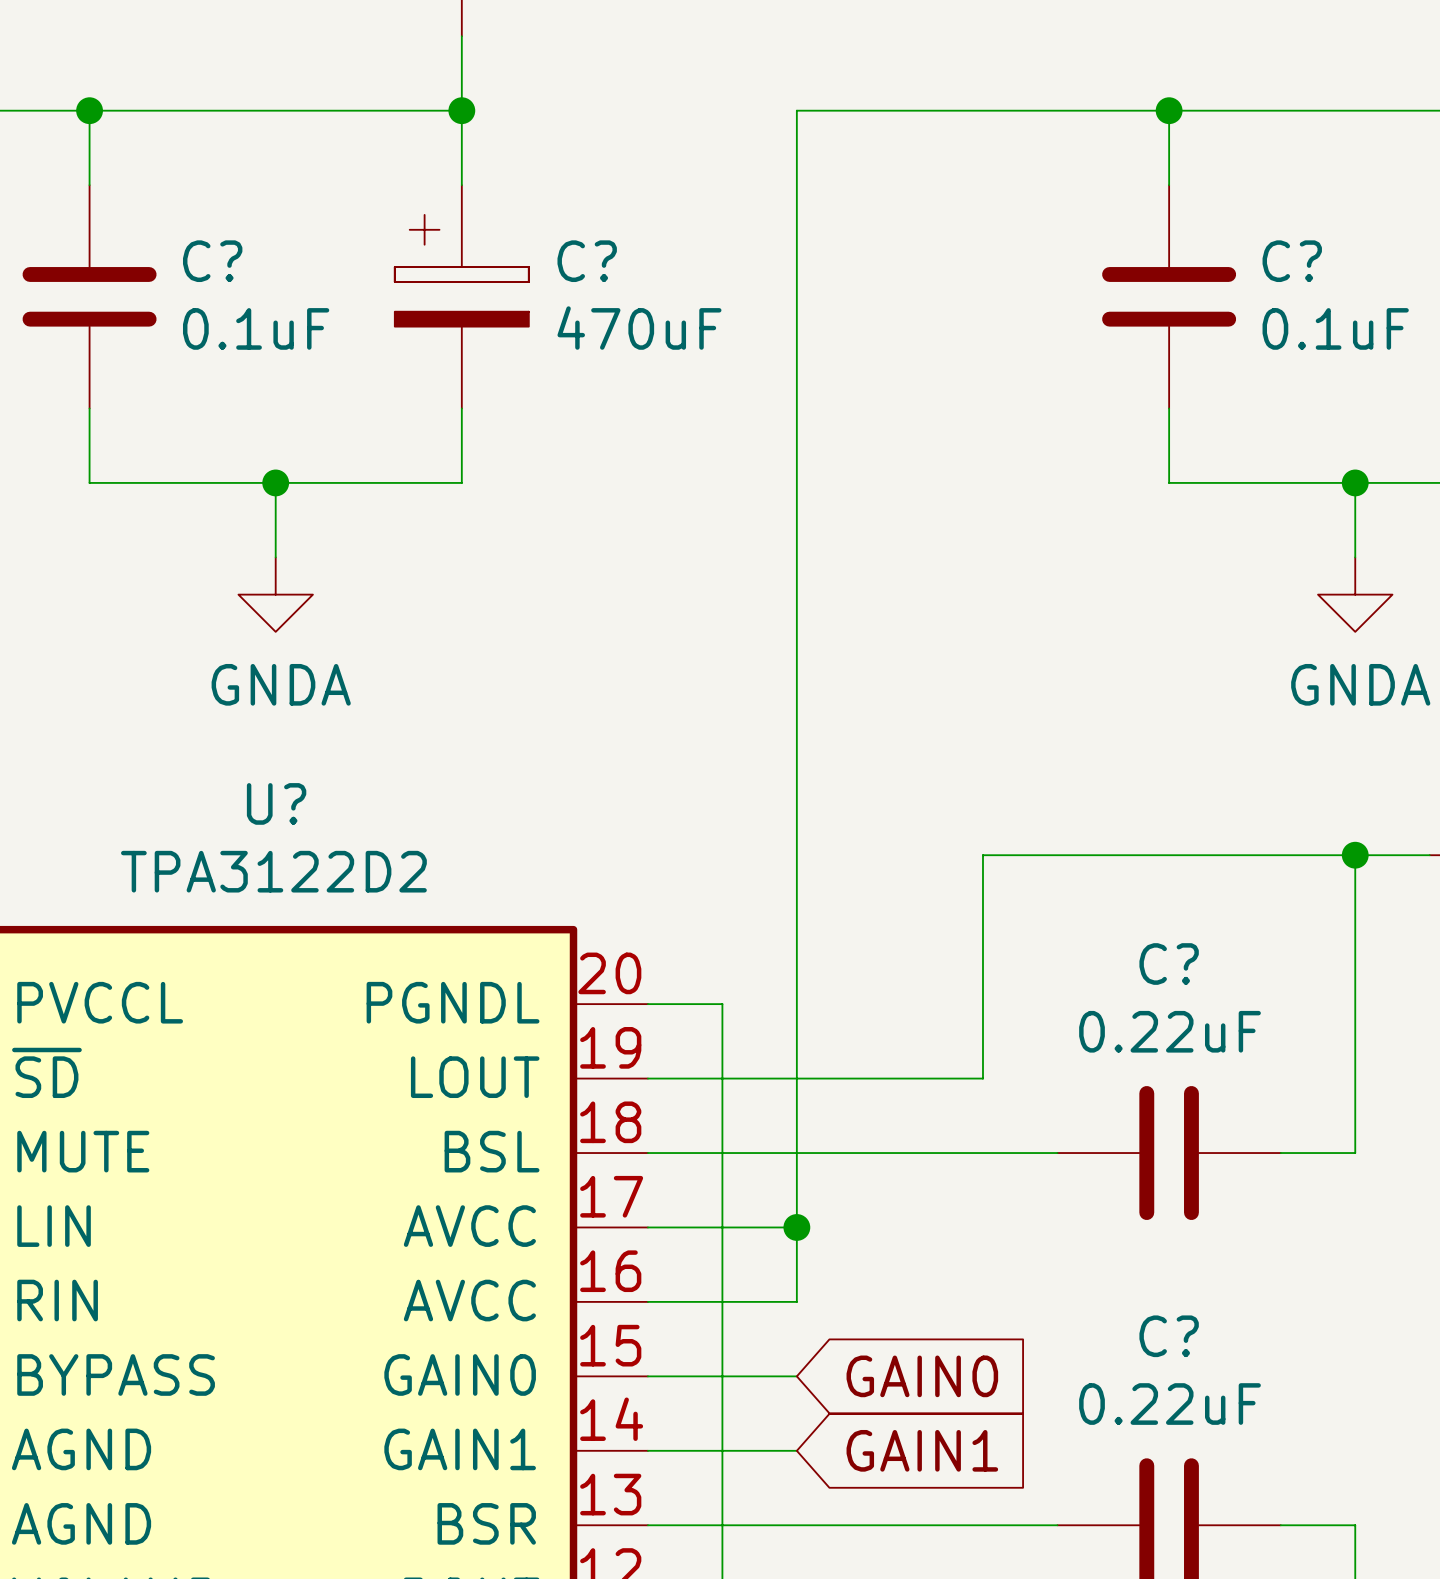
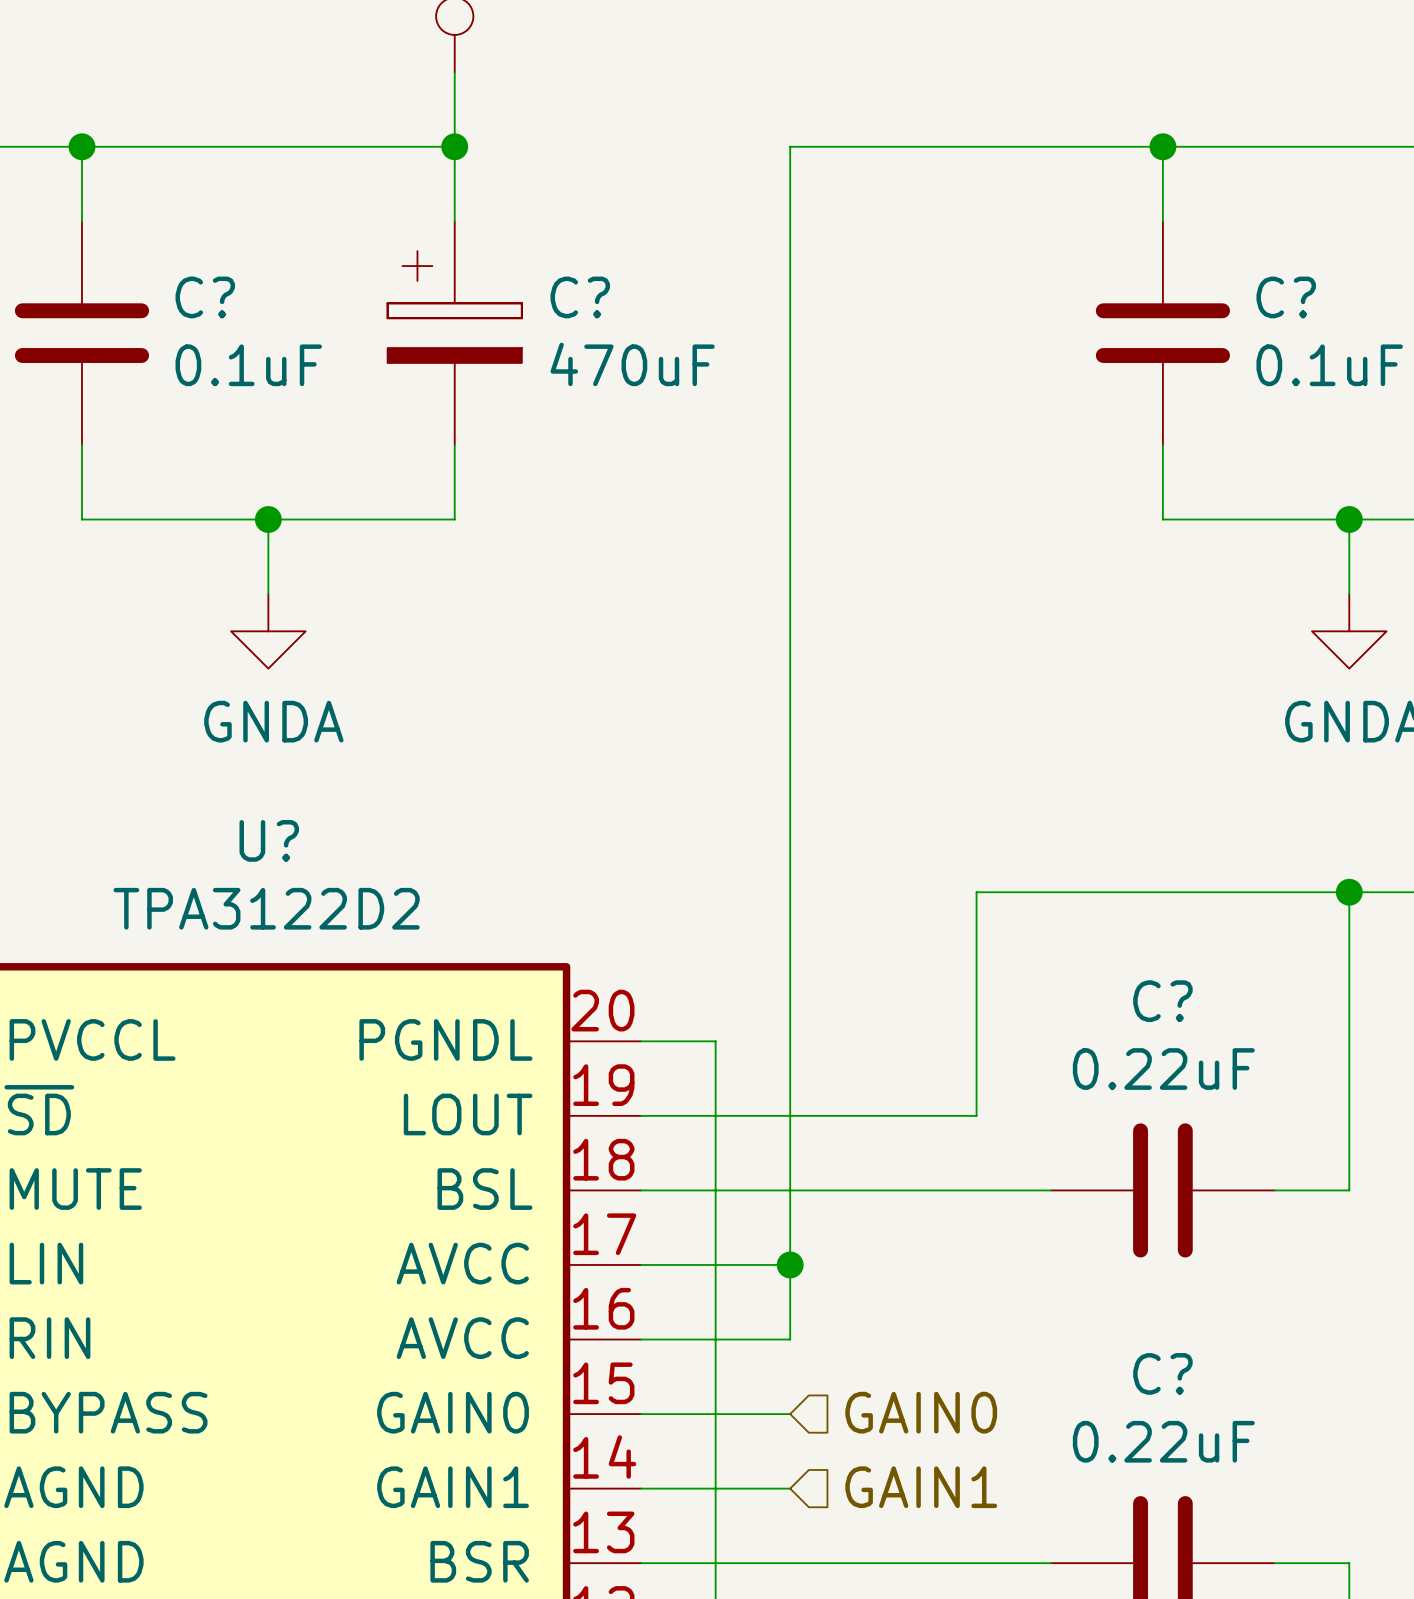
hierarchical label: none -> GAIN0 (921, 1412)
global label: GAIN0 (922, 1376) -> none
hierarchical label: none -> GAIN1 (921, 1487)
global label: GAIN1 (922, 1450) -> none

